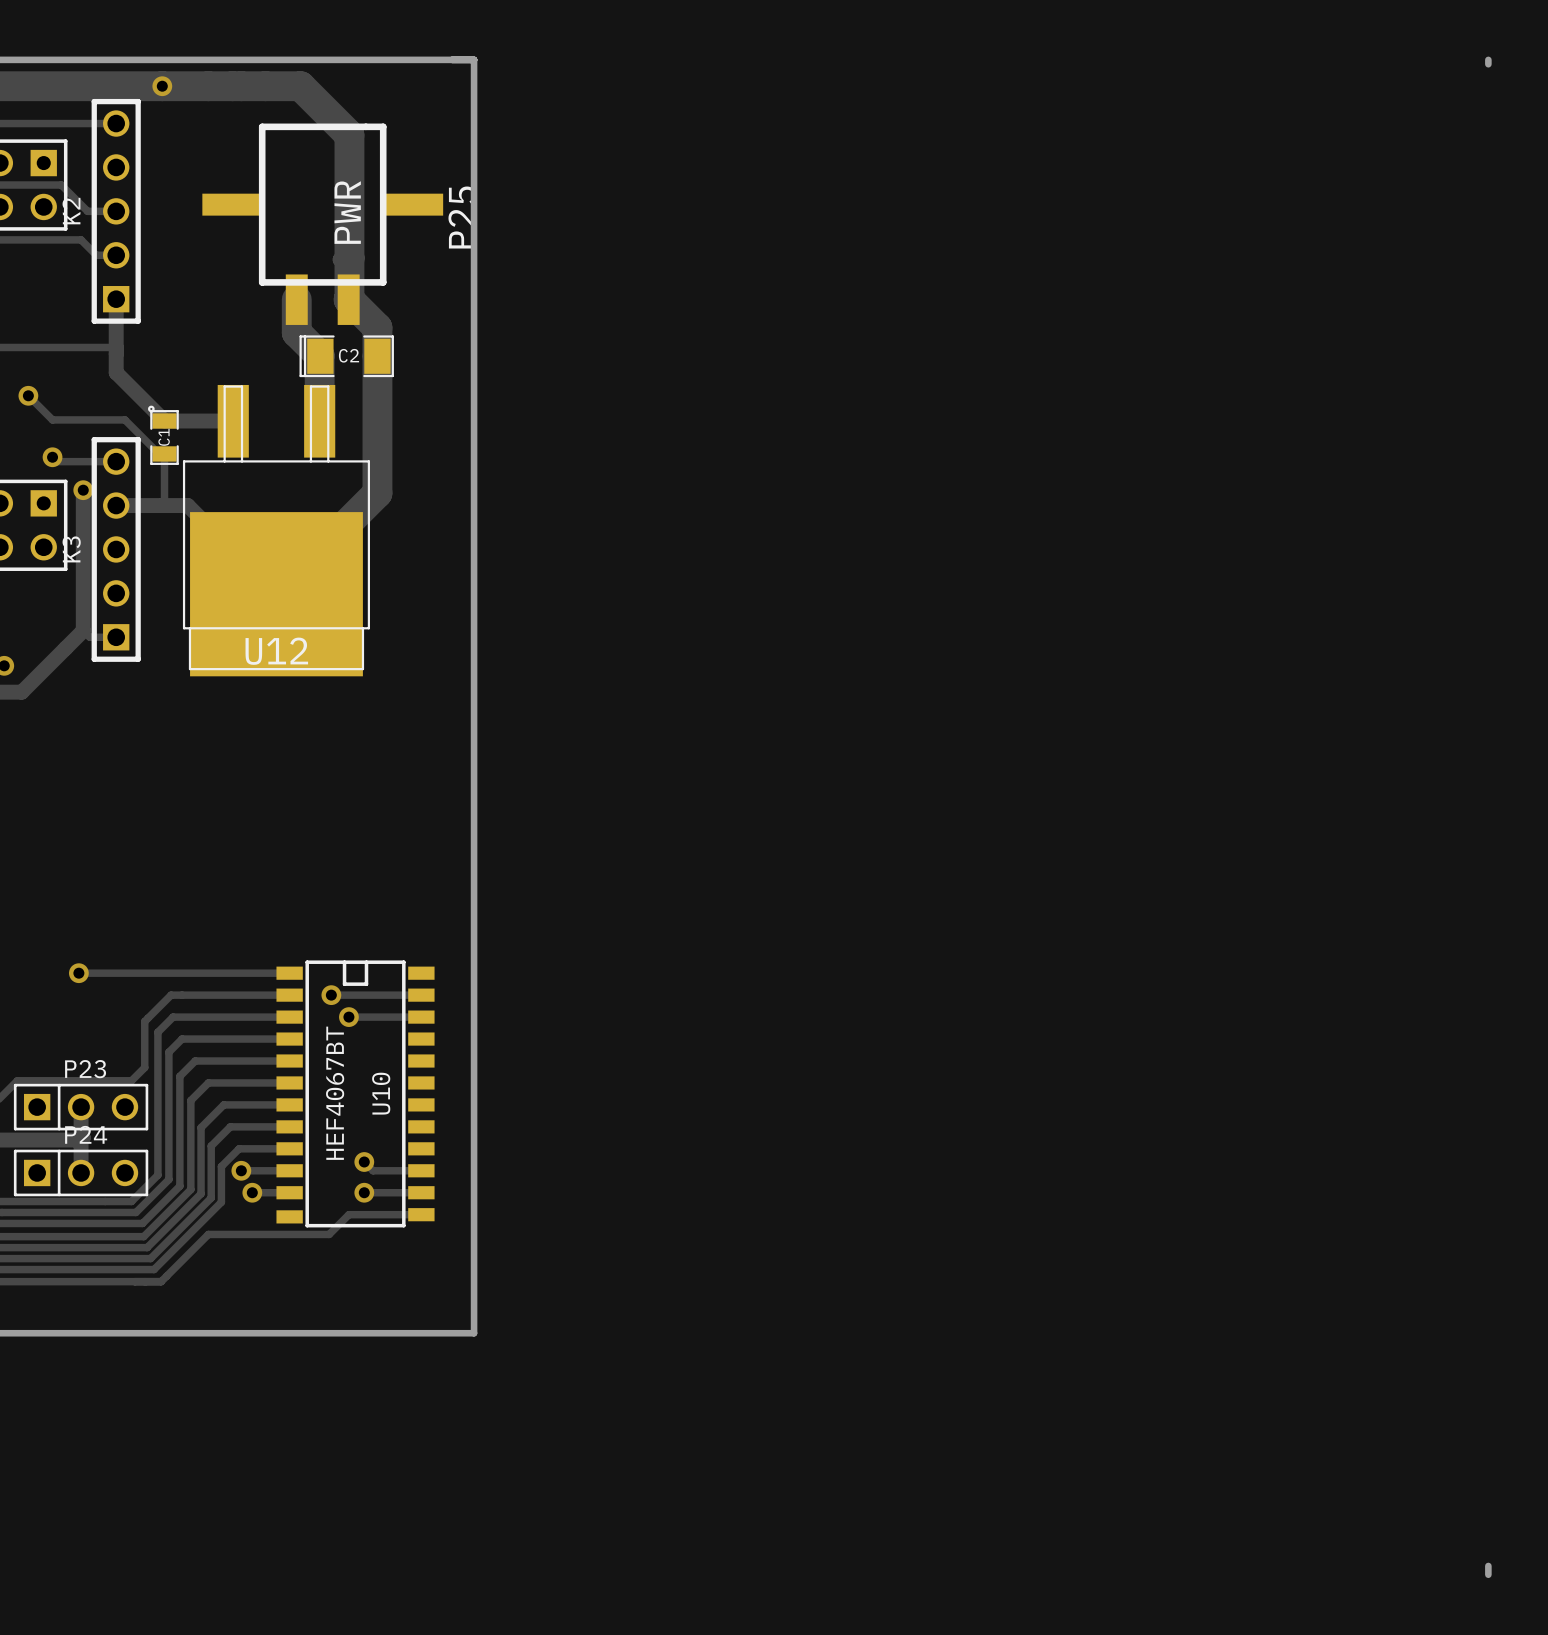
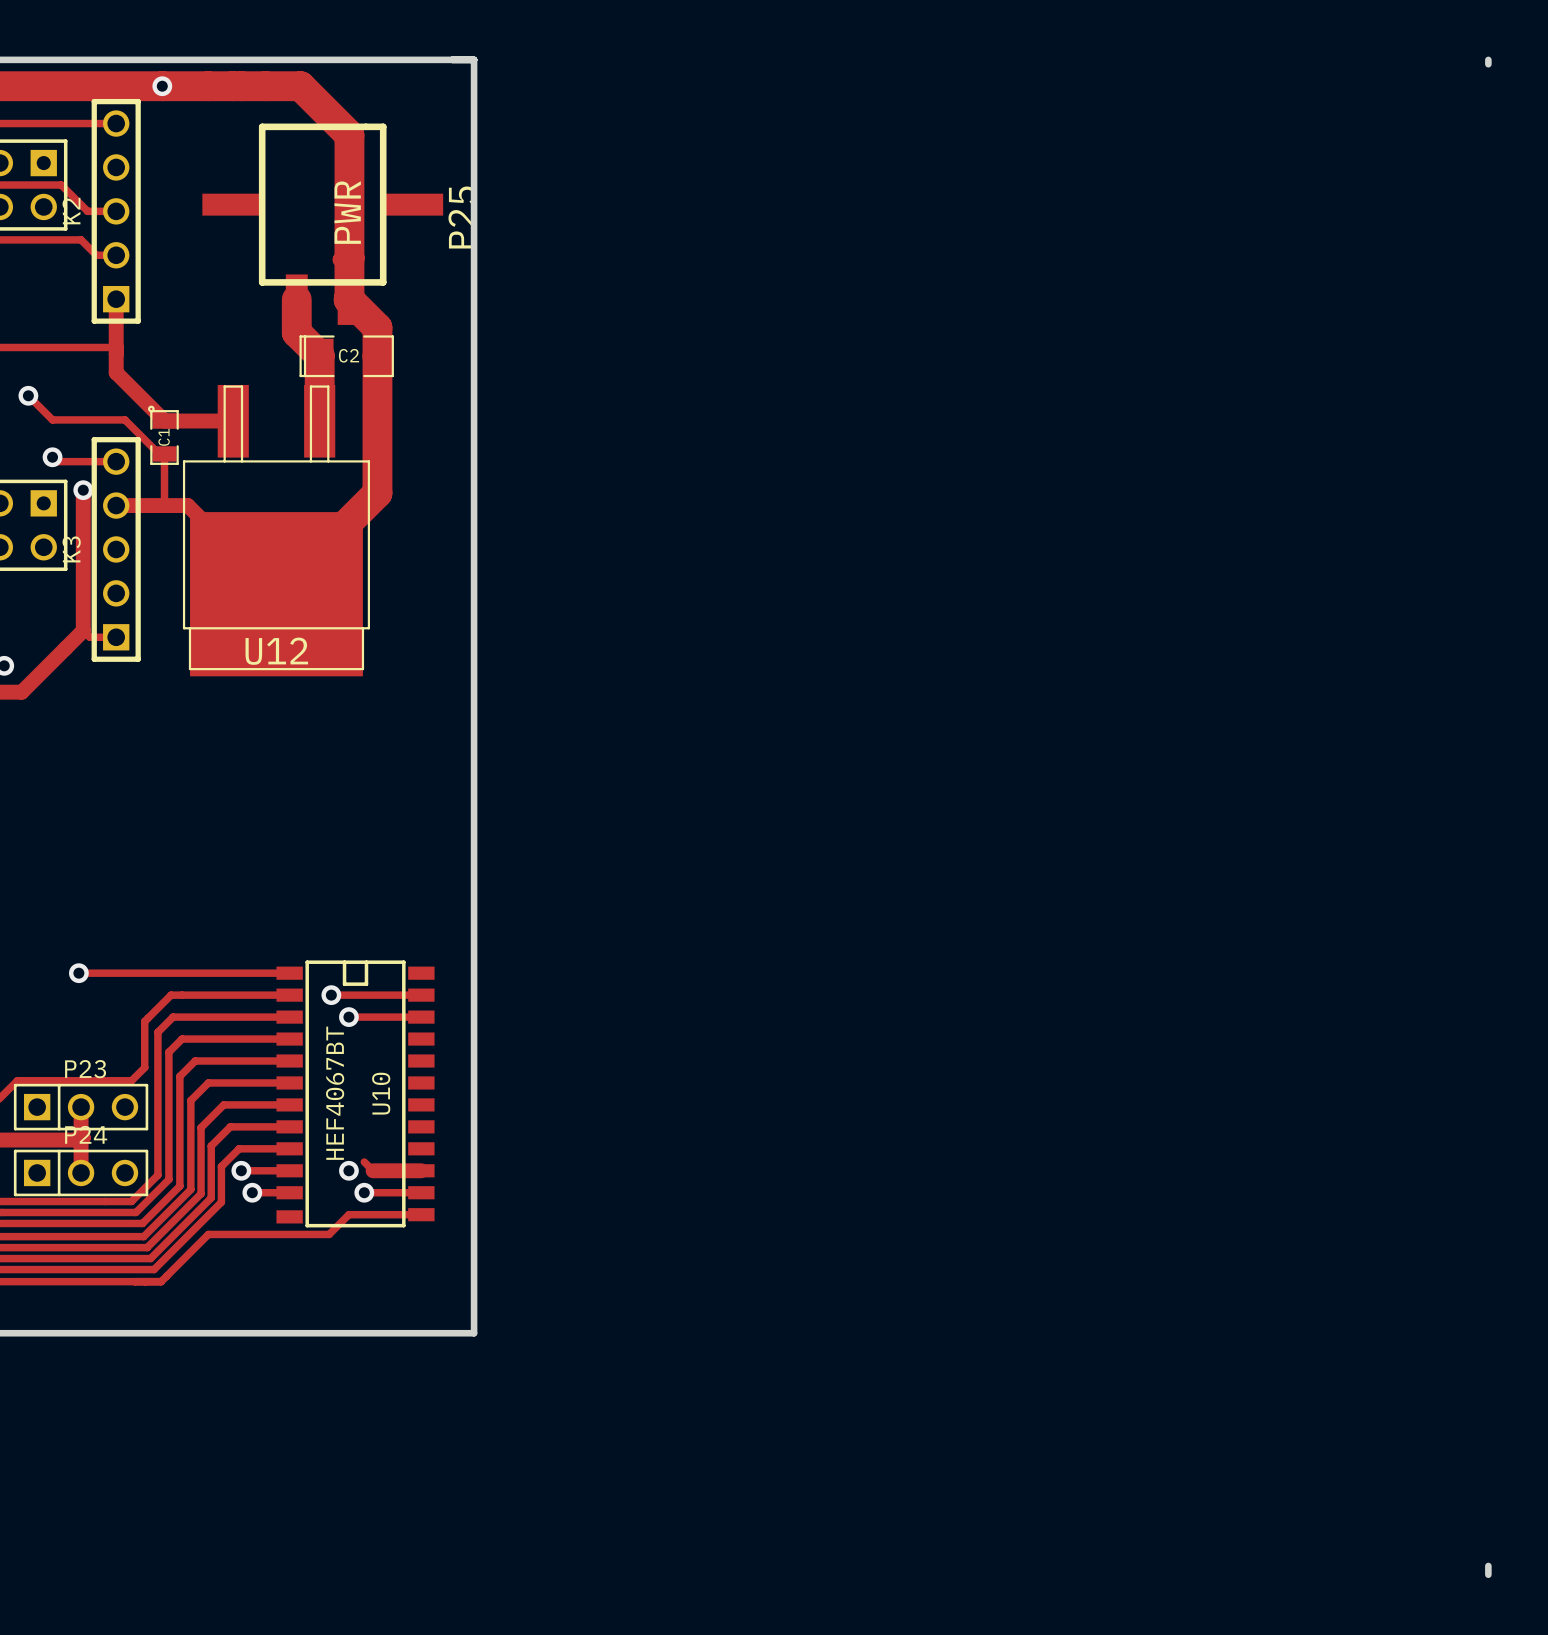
via position: (364, 1162) -> (348, 1170)
track width: thin (373, 1170) (421, 1170) -> thick (373, 1170) (421, 1170)

